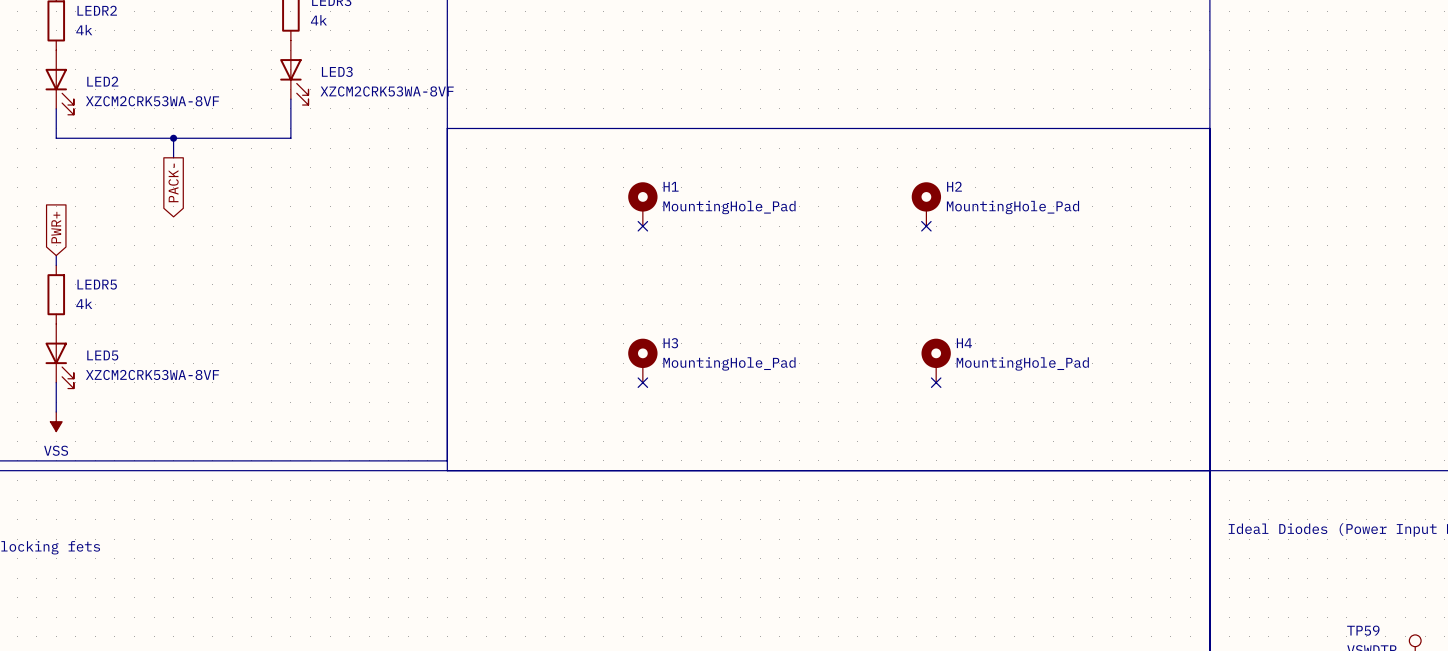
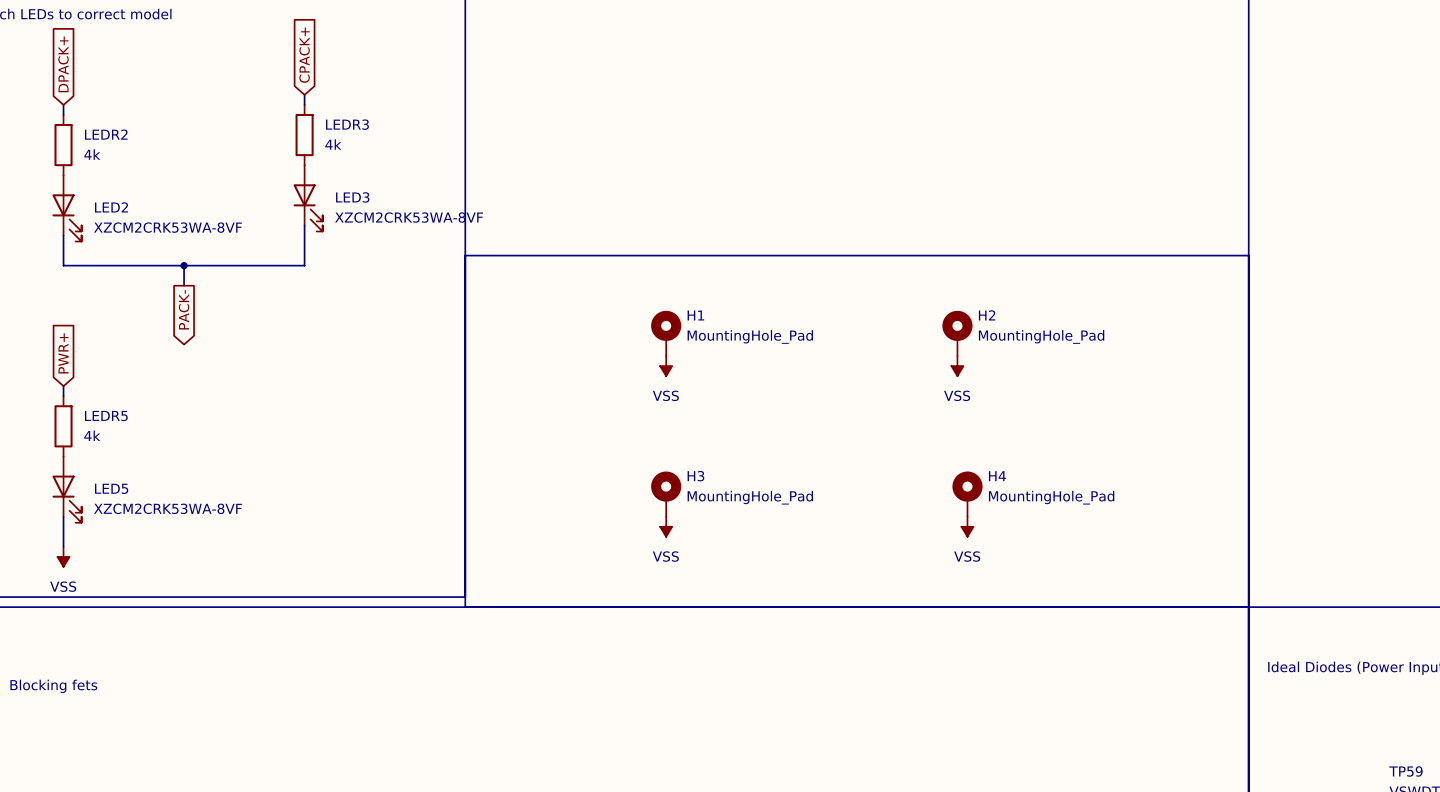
no-connect mark: (642, 226) -> none
no-connect mark: (926, 226) -> none
power symbol: none -> VSS (666, 366)
power symbol: none -> VSS (957, 366)
no-connect mark: (642, 382) -> none
no-connect mark: (936, 382) -> none
power symbol: none -> VSS (666, 526)
power symbol: none -> VSS (967, 526)

